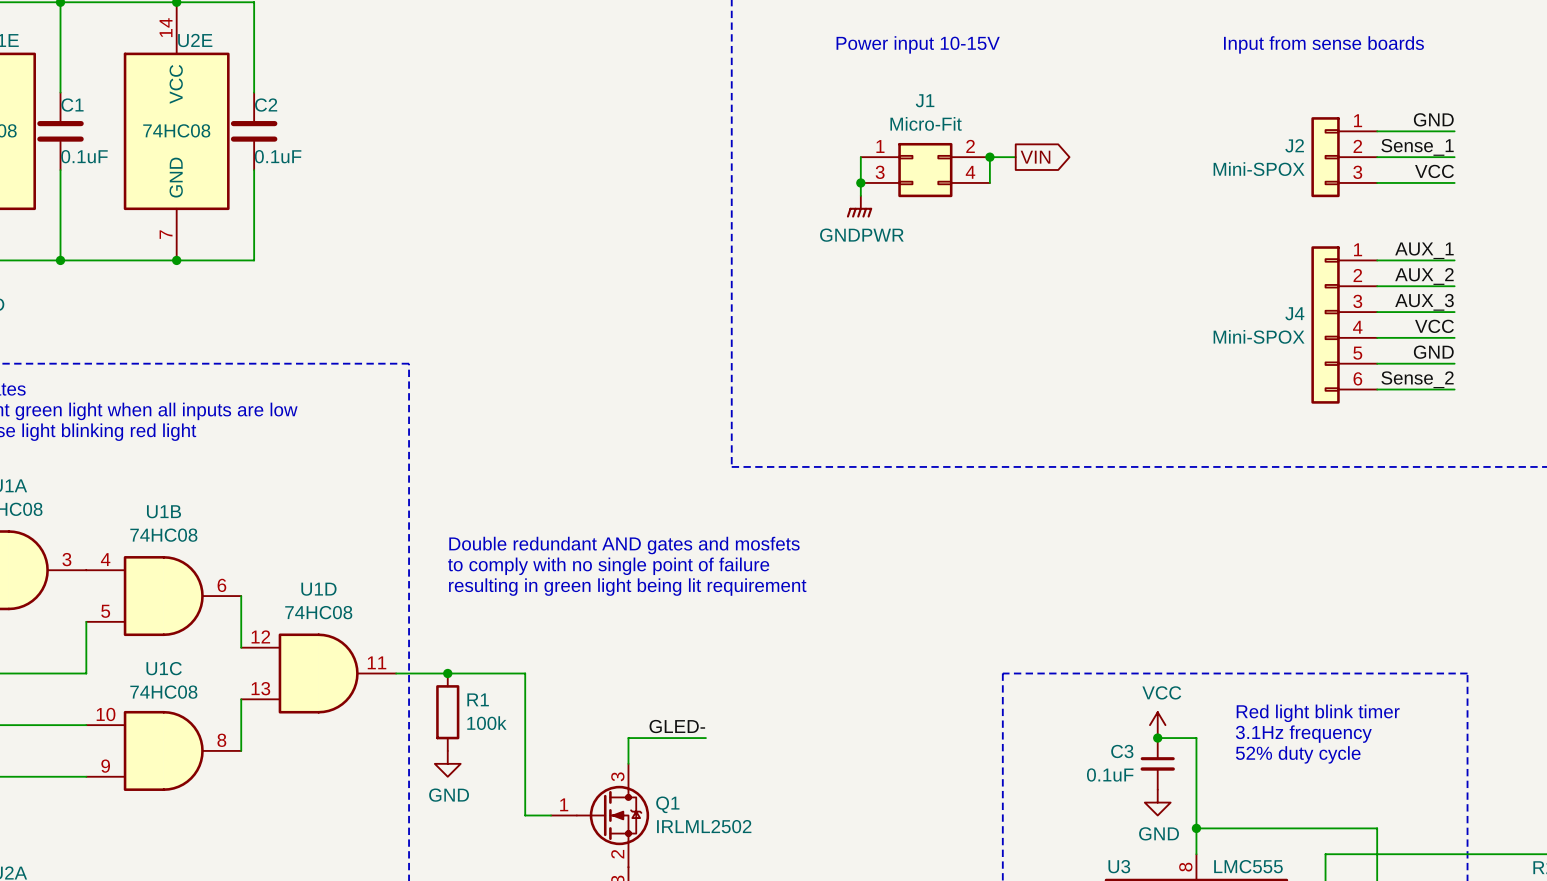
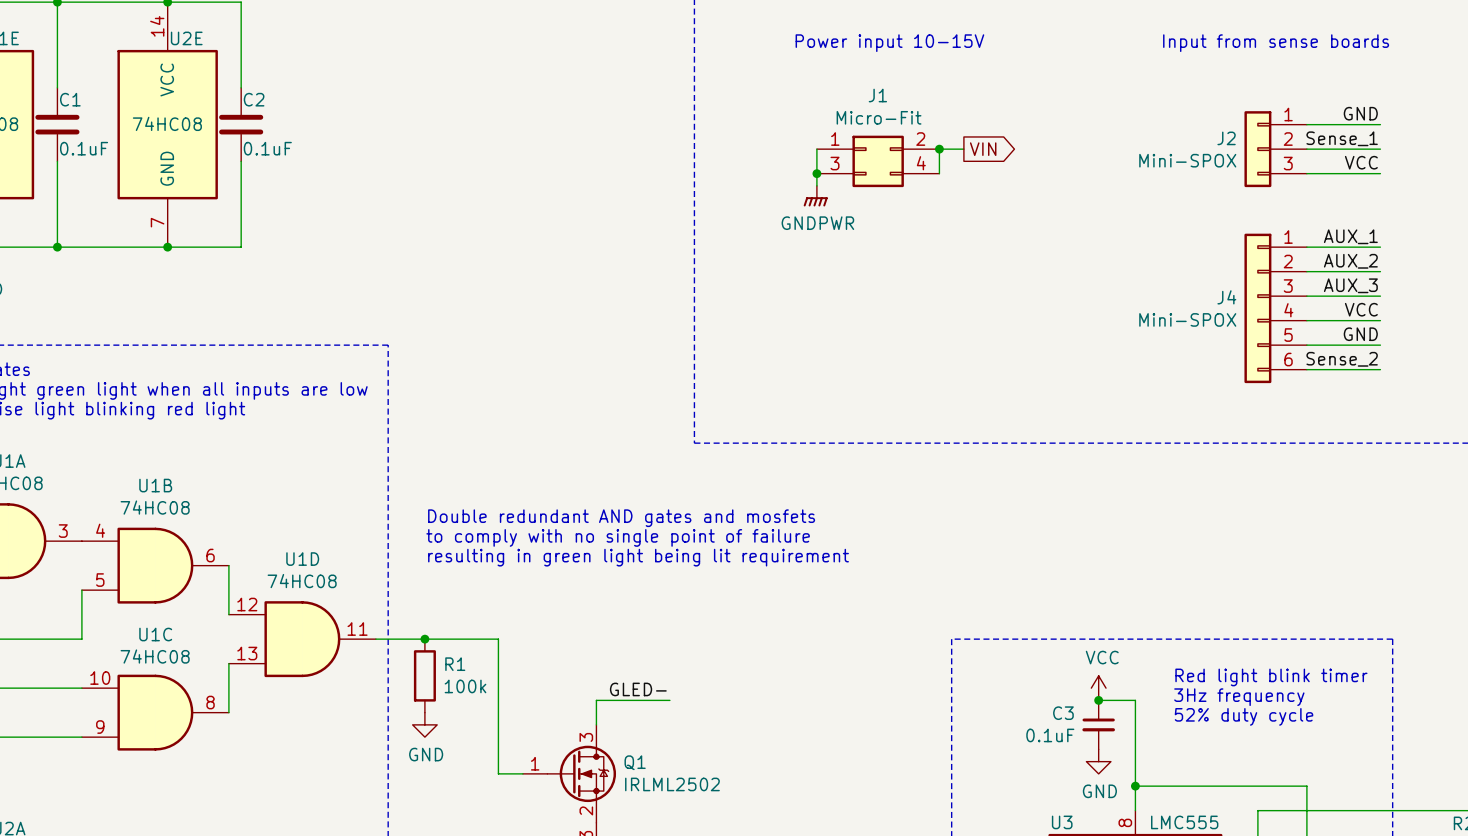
text: 3.1Hz frequency (1303, 734) -> 3Hz frequency (1239, 697)

